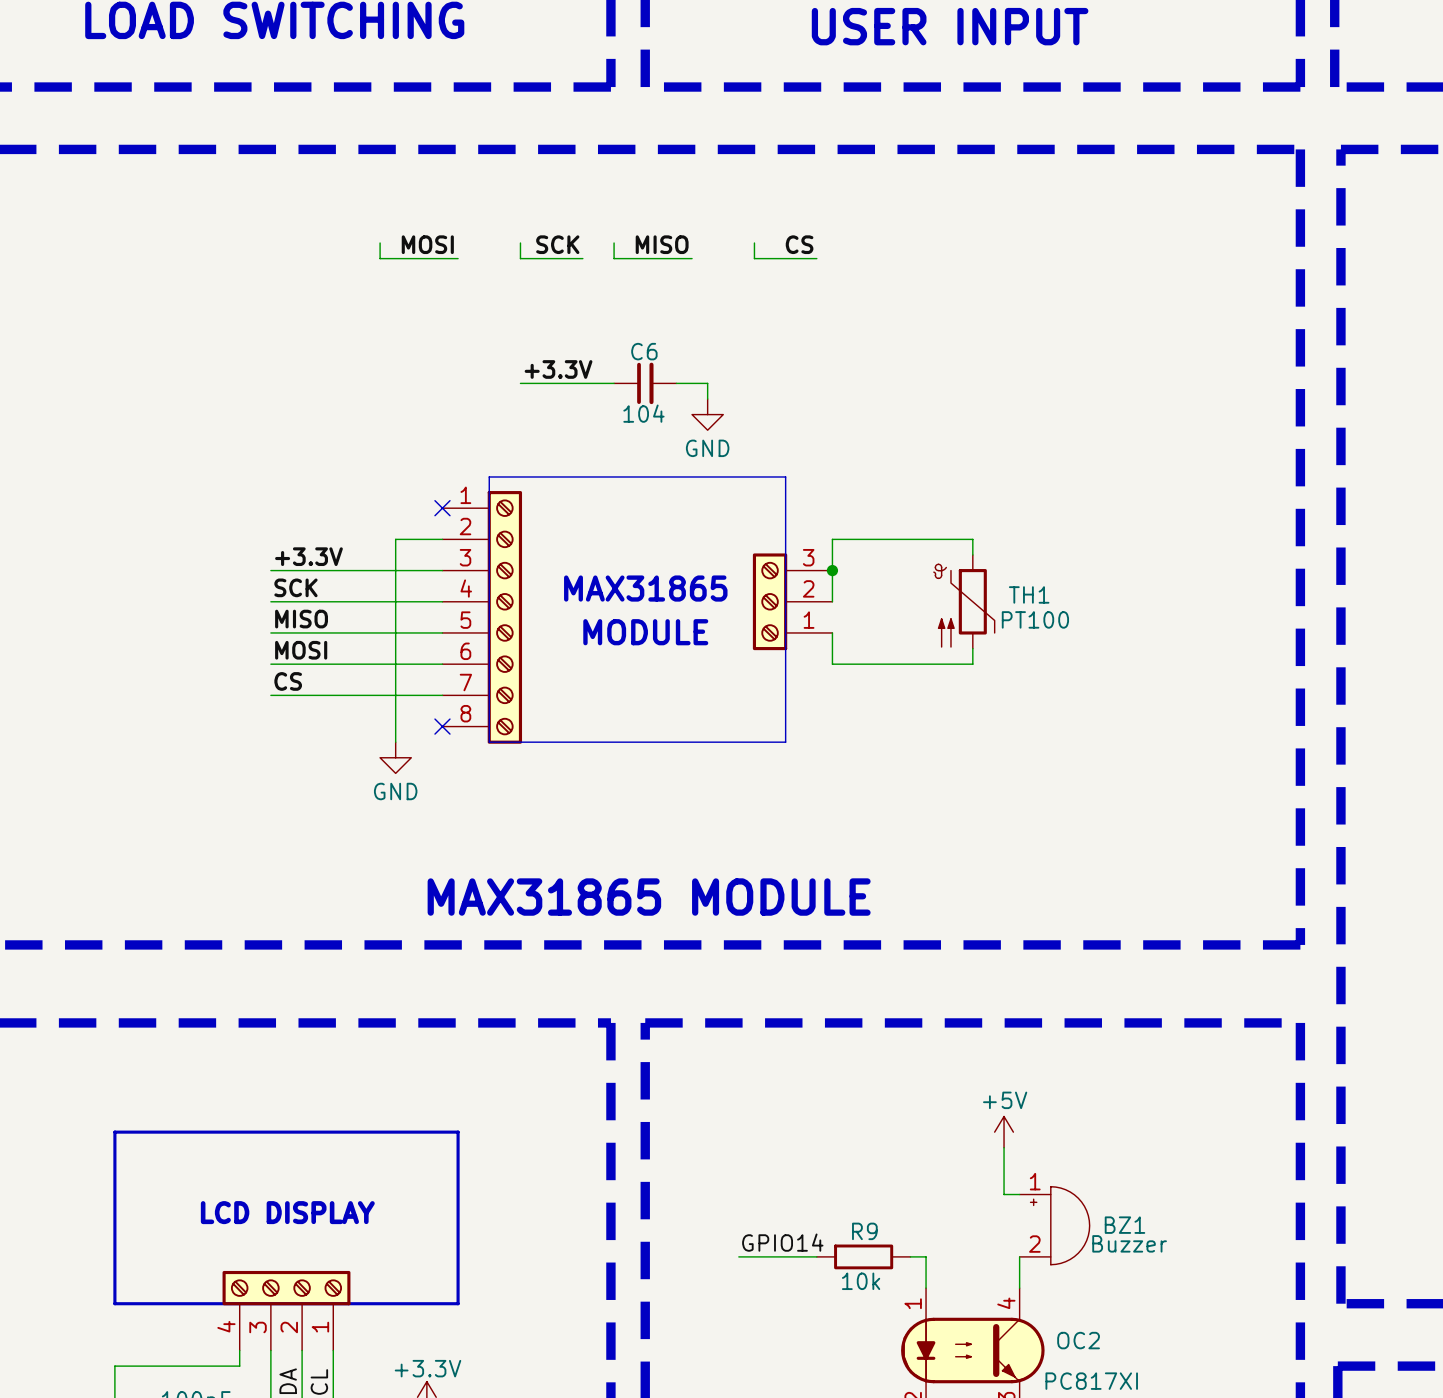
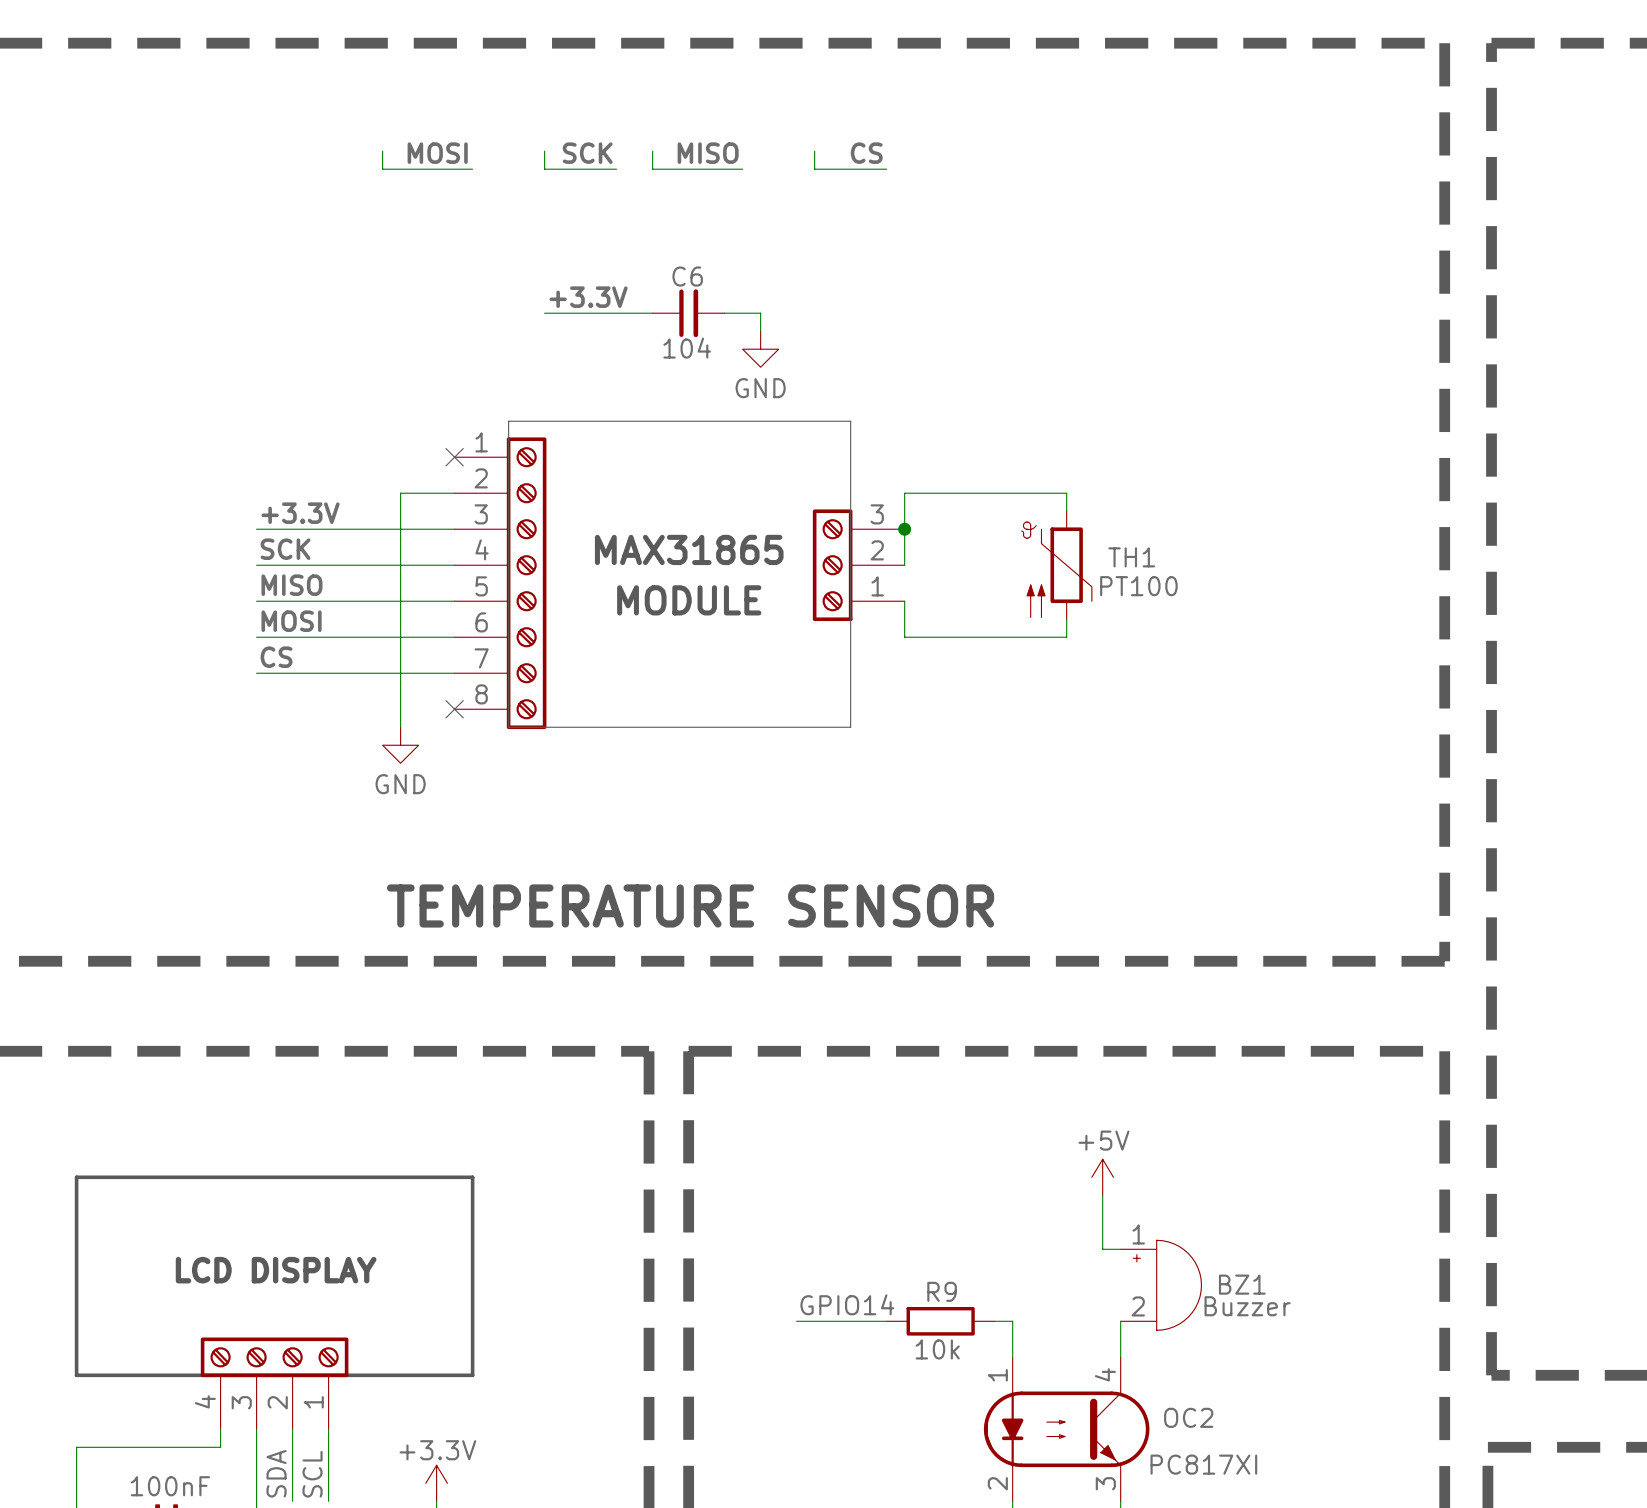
text: MAX31865 MODULE (649, 897) -> TEMPERATURE SENSOR (690, 905)

